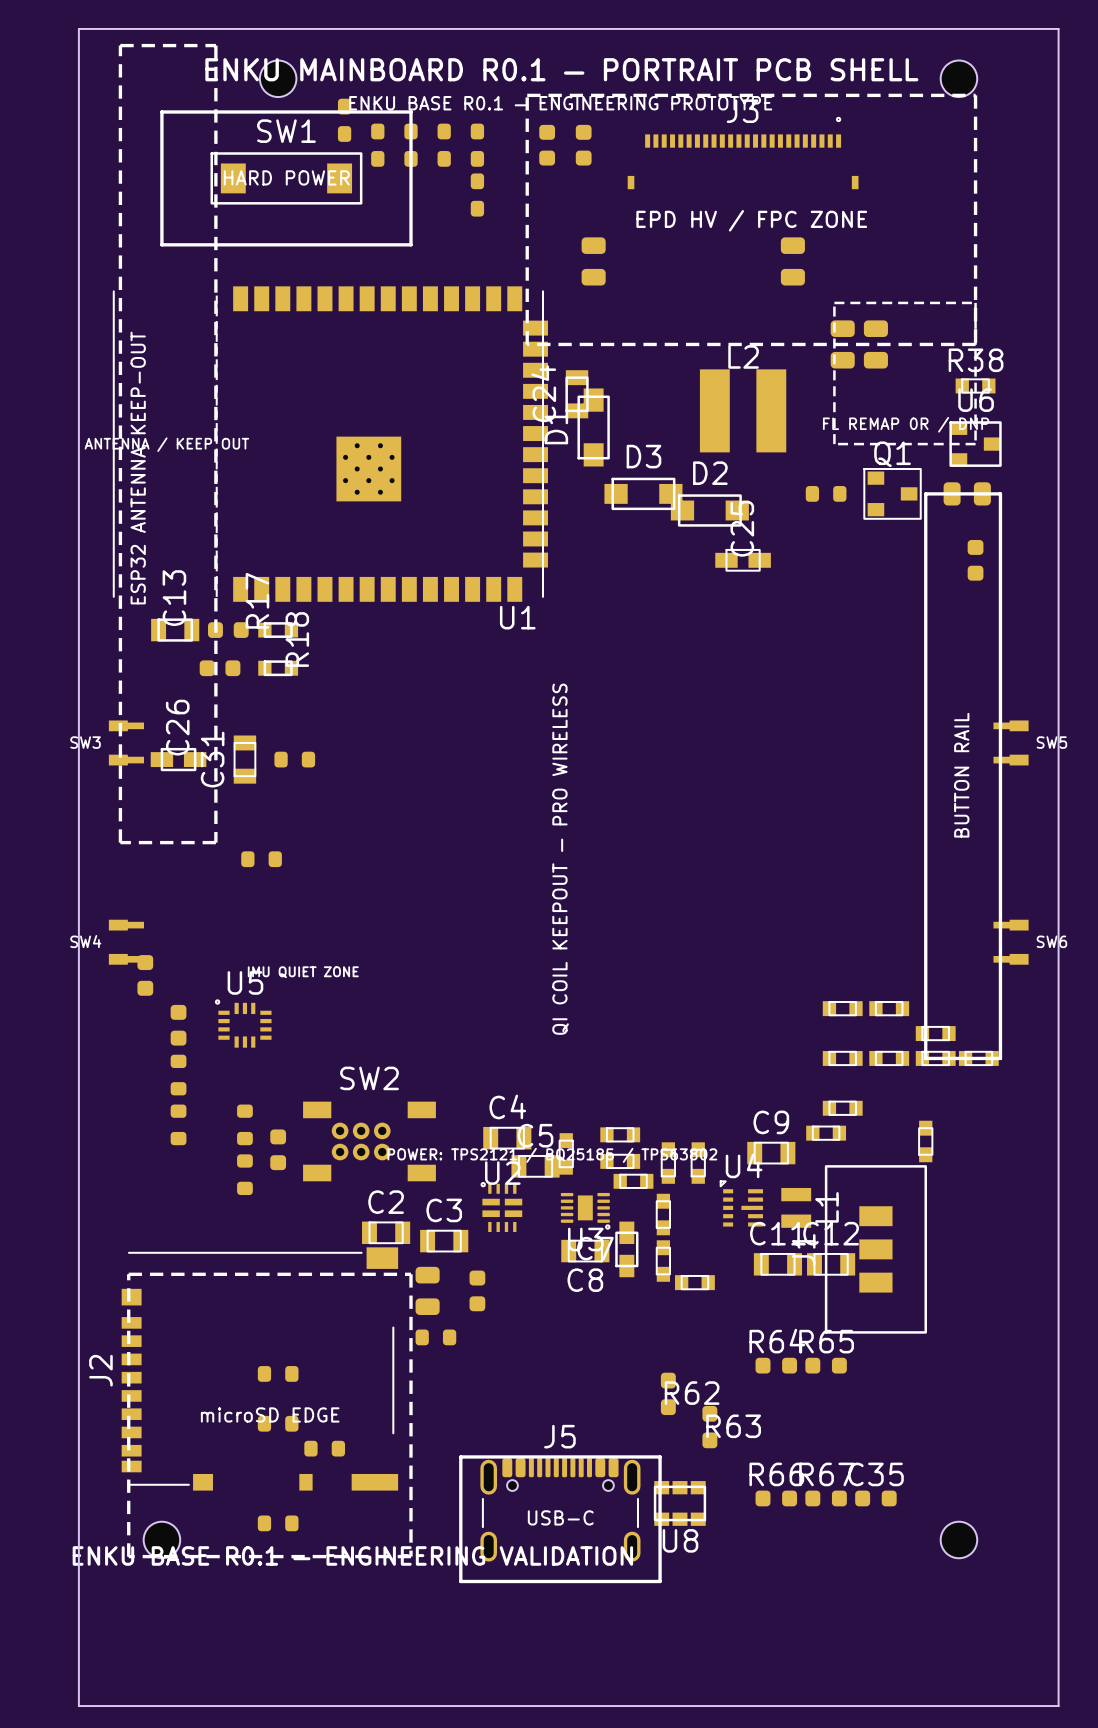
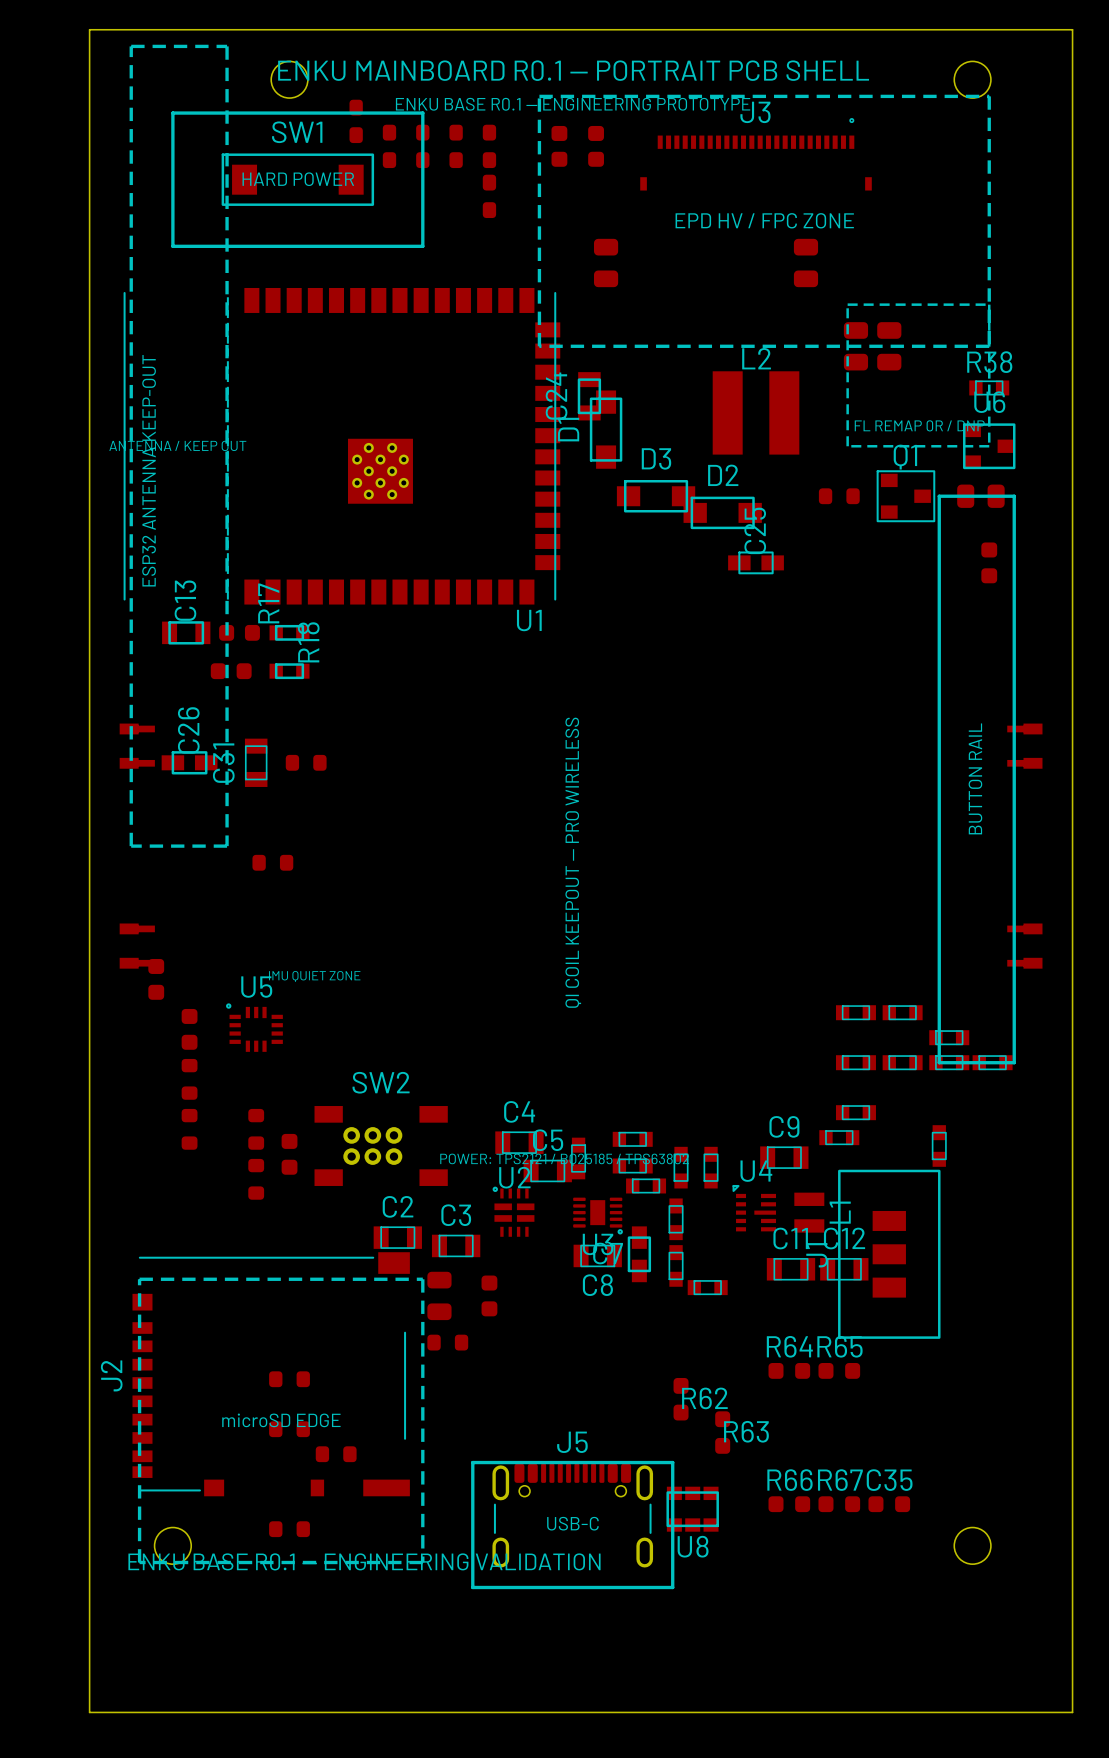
SW3 name: SW3 (85, 742) -> none
SW5 name: SW5 (1051, 742) -> none
SW4 name: SW4 (85, 941) -> none
SW6 name: SW6 (1051, 941) -> none

